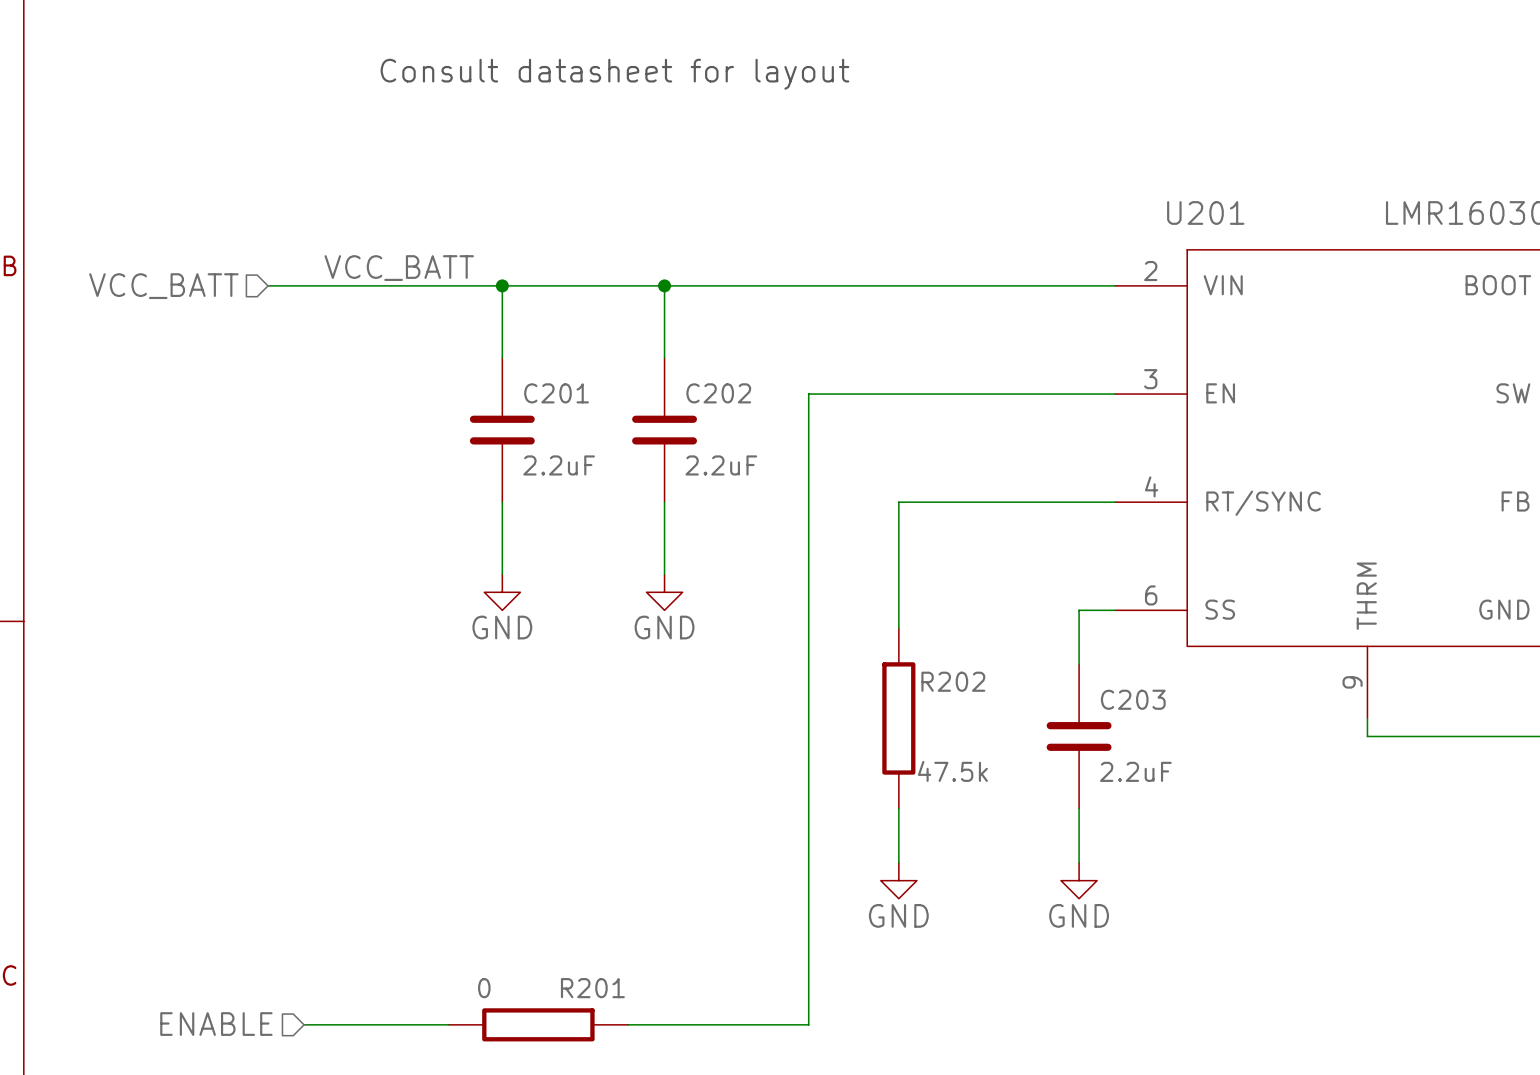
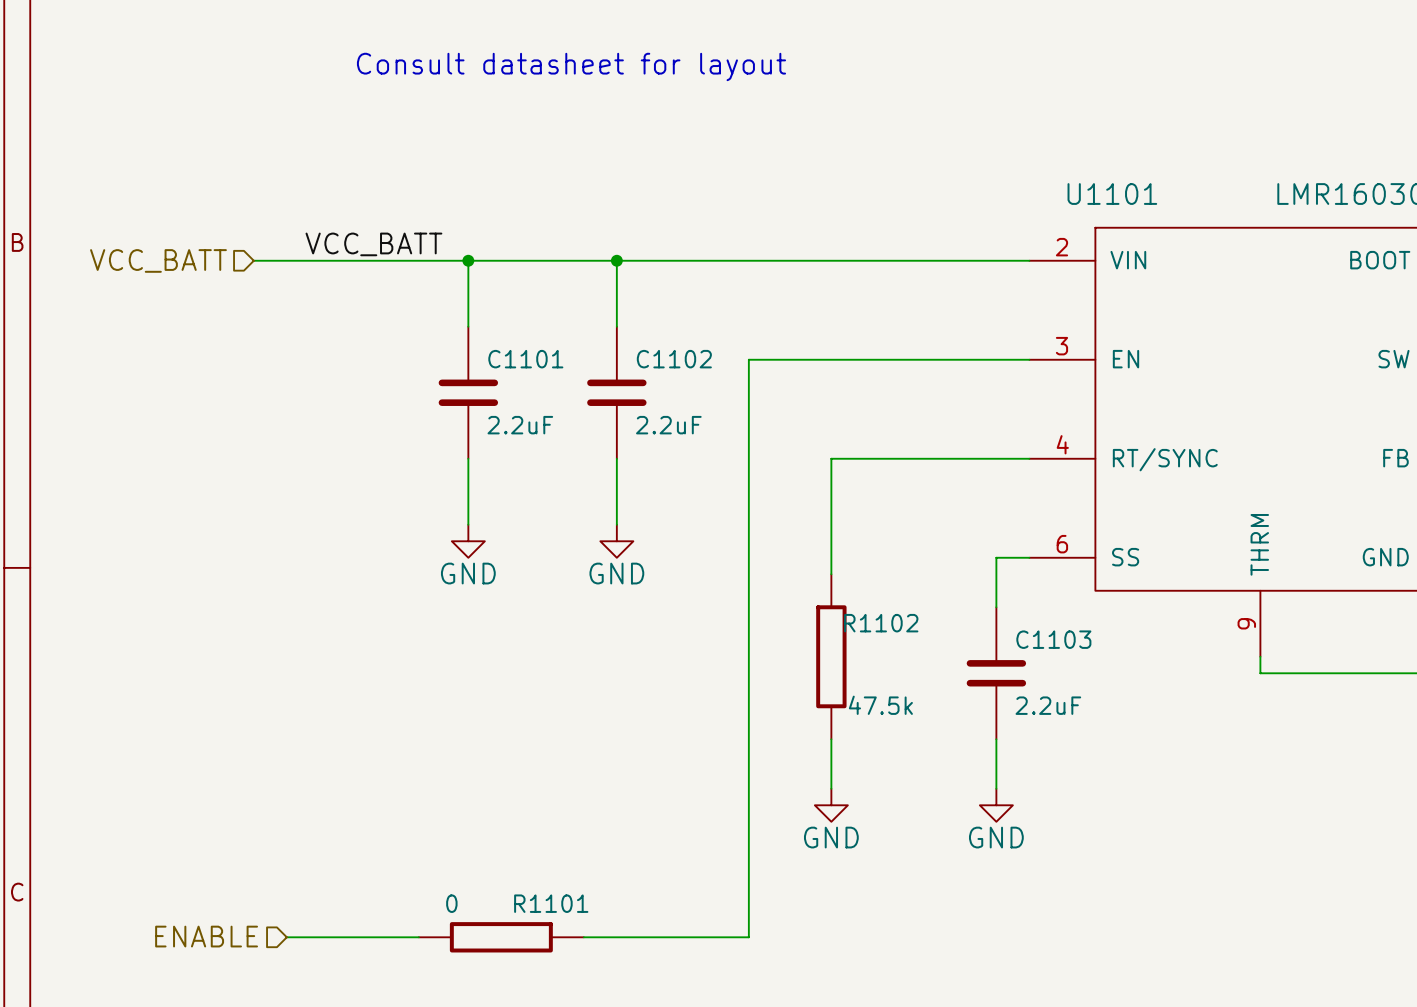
U201 name: U201 (1205, 213) -> U1101 (1112, 194)
C201 name: C201 (556, 393) -> C1101 (525, 359)
C202 name: C202 (718, 393) -> C1102 (674, 359)
R202 name: R202 (953, 681) -> R1102 (881, 623)
C203 name: C203 (1133, 699) -> C1103 (1053, 639)
R201 name: R201 (592, 988) -> R1101 (551, 903)

